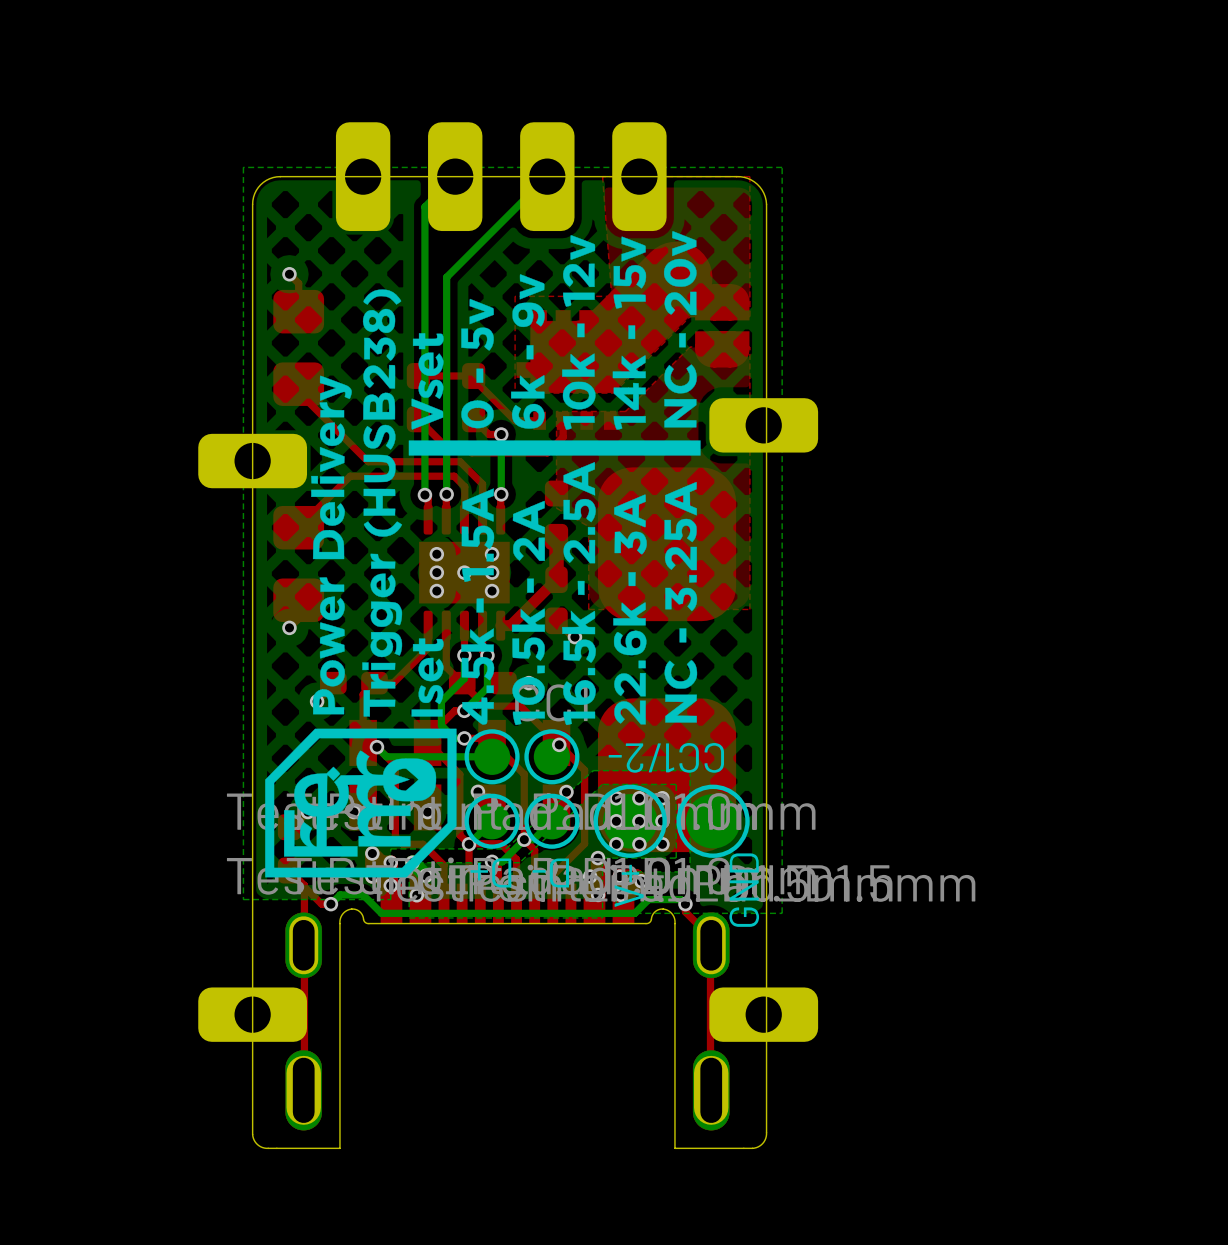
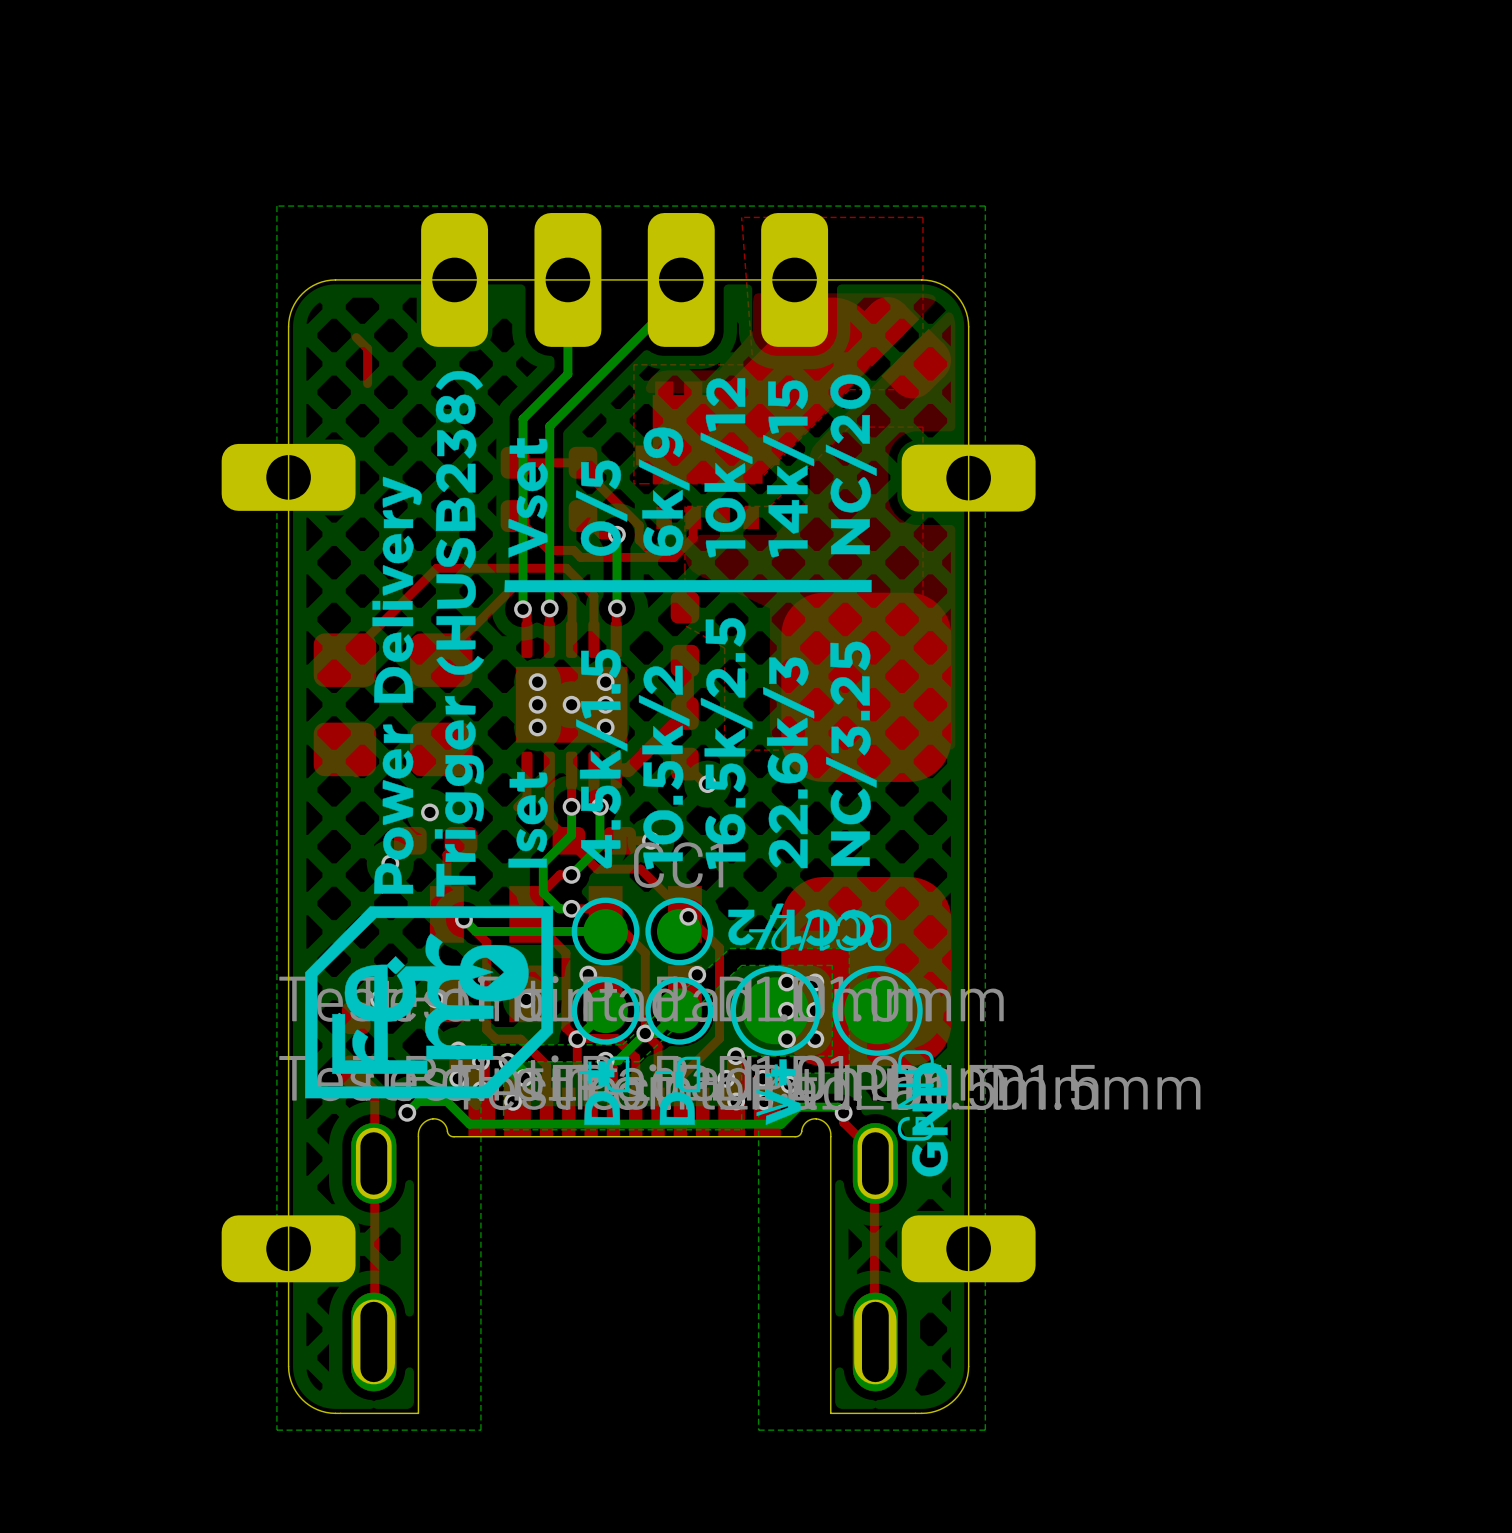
bottom zone outline: (243, 167) (243, 899) (390, 899) -> (299, 206) (276, 206) (276, 1430) (480, 1430) (480, 1107)
bottom zone outline: (782, 167) (782, 913) (616, 913) -> (962, 206) (985, 206) (985, 1430) (758, 1430) (758, 1124)
part: (363, 176) -> none
part: (455, 176) -> none
part: (547, 176) -> none
part: (639, 176) -> none
bottom track: (455, 180) (451, 180) (424, 206) (424, 340) -> (567, 284) (567, 374) (523, 419)
bottom track: (547, 180) (543, 180) (446, 277) (446, 346) -> (681, 284) (681, 294) (549, 426)
part: none -> (454, 279)
part: none -> (567, 279)
part: none -> (681, 279)
part: none -> (794, 279)
drawing: [265, 231, 701, 878] -> none
via: (289, 274) -> none
part: none -> (900, 347)
drawing: none -> [305, 370, 948, 1177]
part: (722, 325) -> none
part position: (298, 347) -> (441, 704)
top track: (473, 379) (515, 420) (539, 420) -> (582, 466) (582, 469) (639, 525) (639, 540) (651, 551) (664, 551)
top track: (298, 384) (298, 392) (368, 461) -> (344, 660) (436, 568) (453, 568)
part position: (763, 425) -> (968, 478)
part position: (252, 461) -> (288, 477)
top track: (418, 476) (350, 476) (298, 527) -> (514, 586) (446, 653) (446, 660)
part position: (298, 563) -> (344, 704)
via position: (289, 627) -> (429, 812)
top track: (420, 655) (393, 683) (379, 683) -> none
part position: (667, 659) -> (866, 829)
via: (616, 798) -> none
via: (616, 821) -> none
via: (616, 844) -> none
top track: (304, 886) (321, 904) (330, 904) -> none
part position: (252, 1014) -> (288, 1248)
part position: (763, 1014) -> (968, 1248)
board edge: (748, 1148) (761, 1144) (766, 1134) (766, 204) (763, 193) (757, 184) (747, 178) (736, 176) (280, 176) (263, 182) (254, 193) (252, 204) (252, 1134) (259, 1145) (272, 1148) -> (921, 1413) (939, 1409) (954, 1399) (964, 1384) (968, 1366) (968, 326) (964, 308) (954, 293) (939, 283) (921, 279) (335, 279) (313, 285) (302, 293) (294, 304) (288, 326) (288, 1366) (292, 1384) (302, 1399) (317, 1409) (335, 1413)

